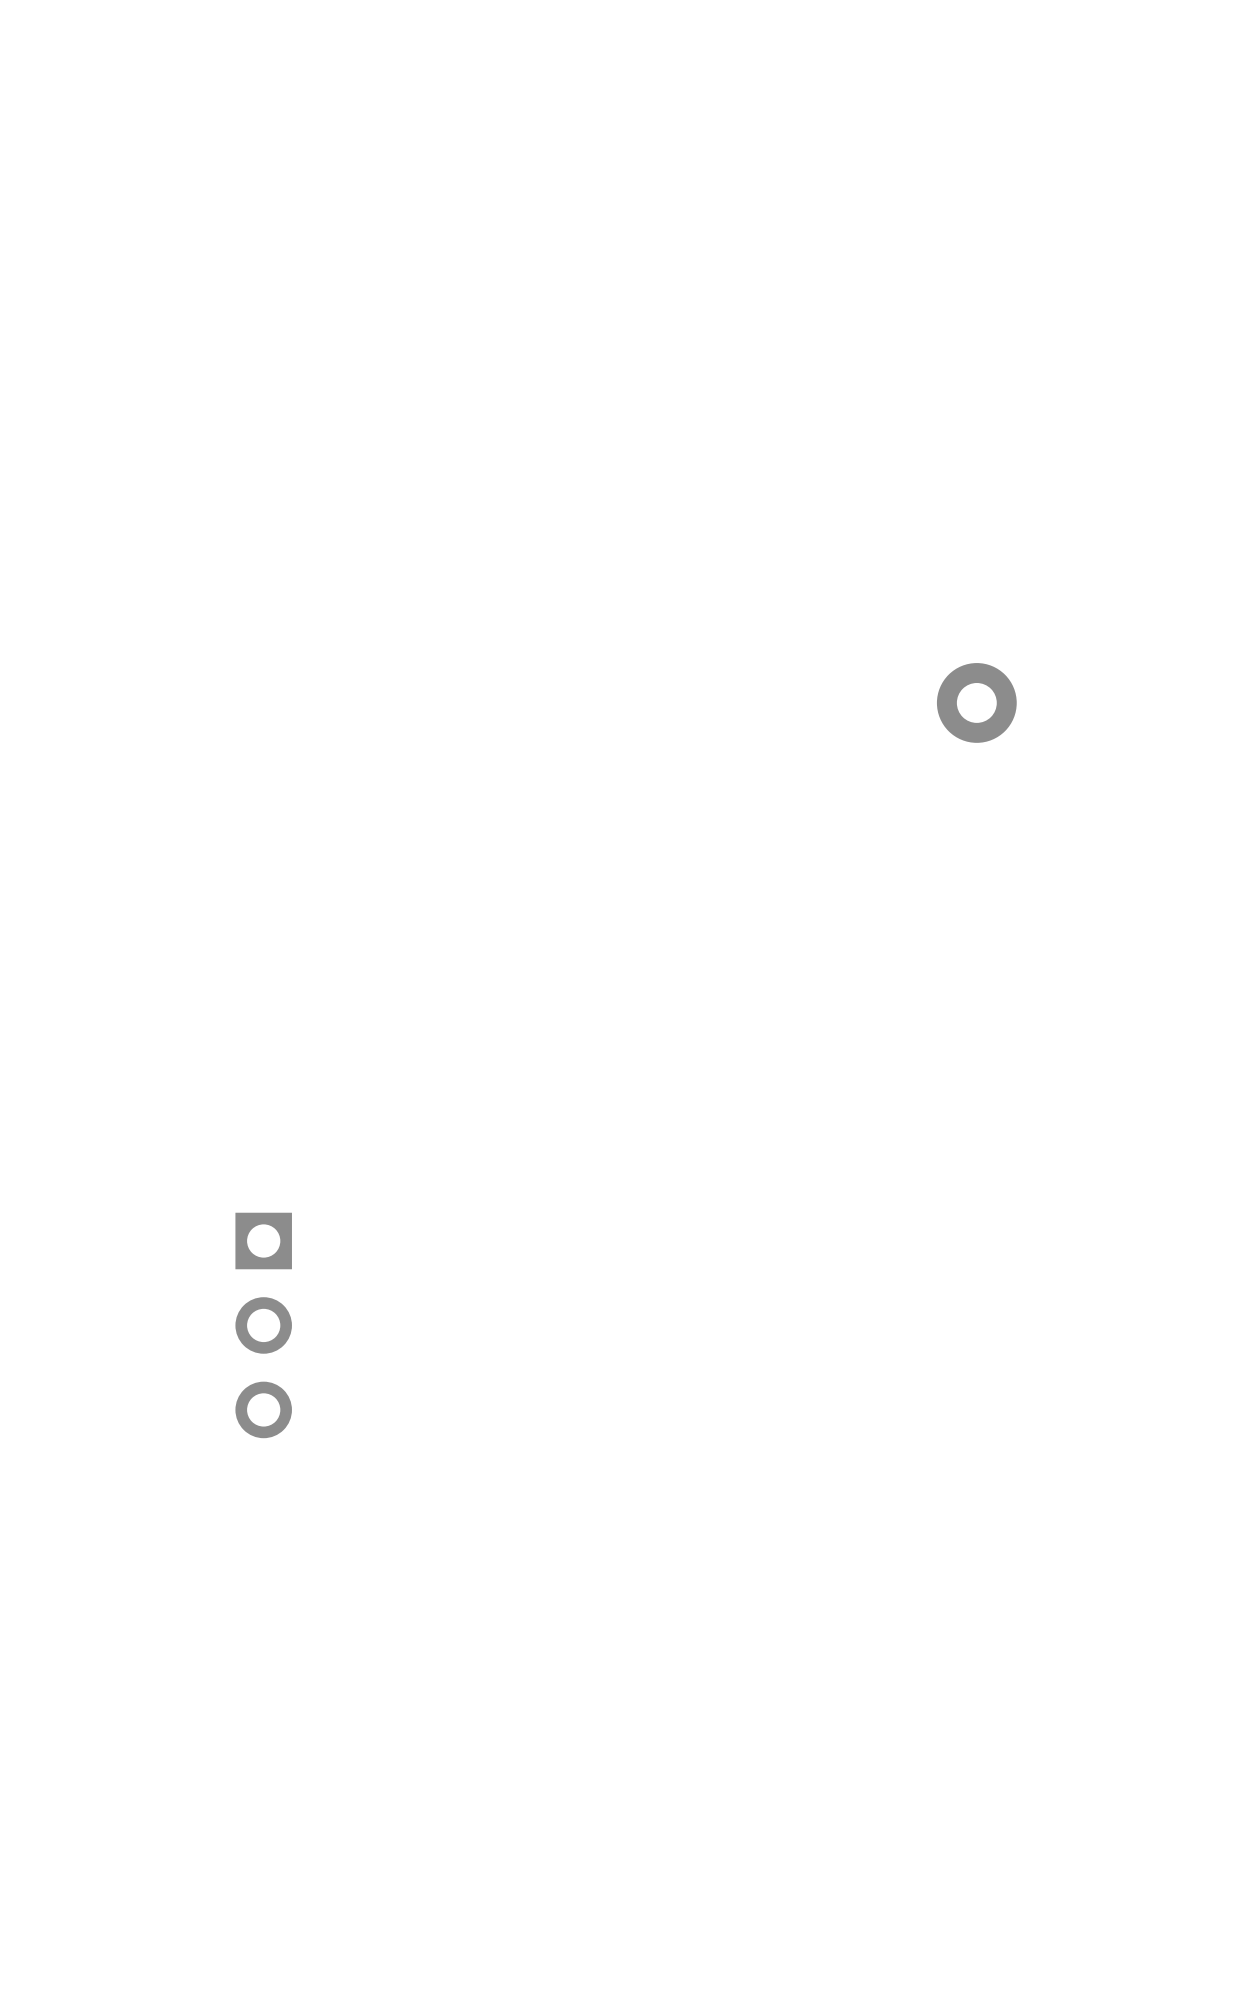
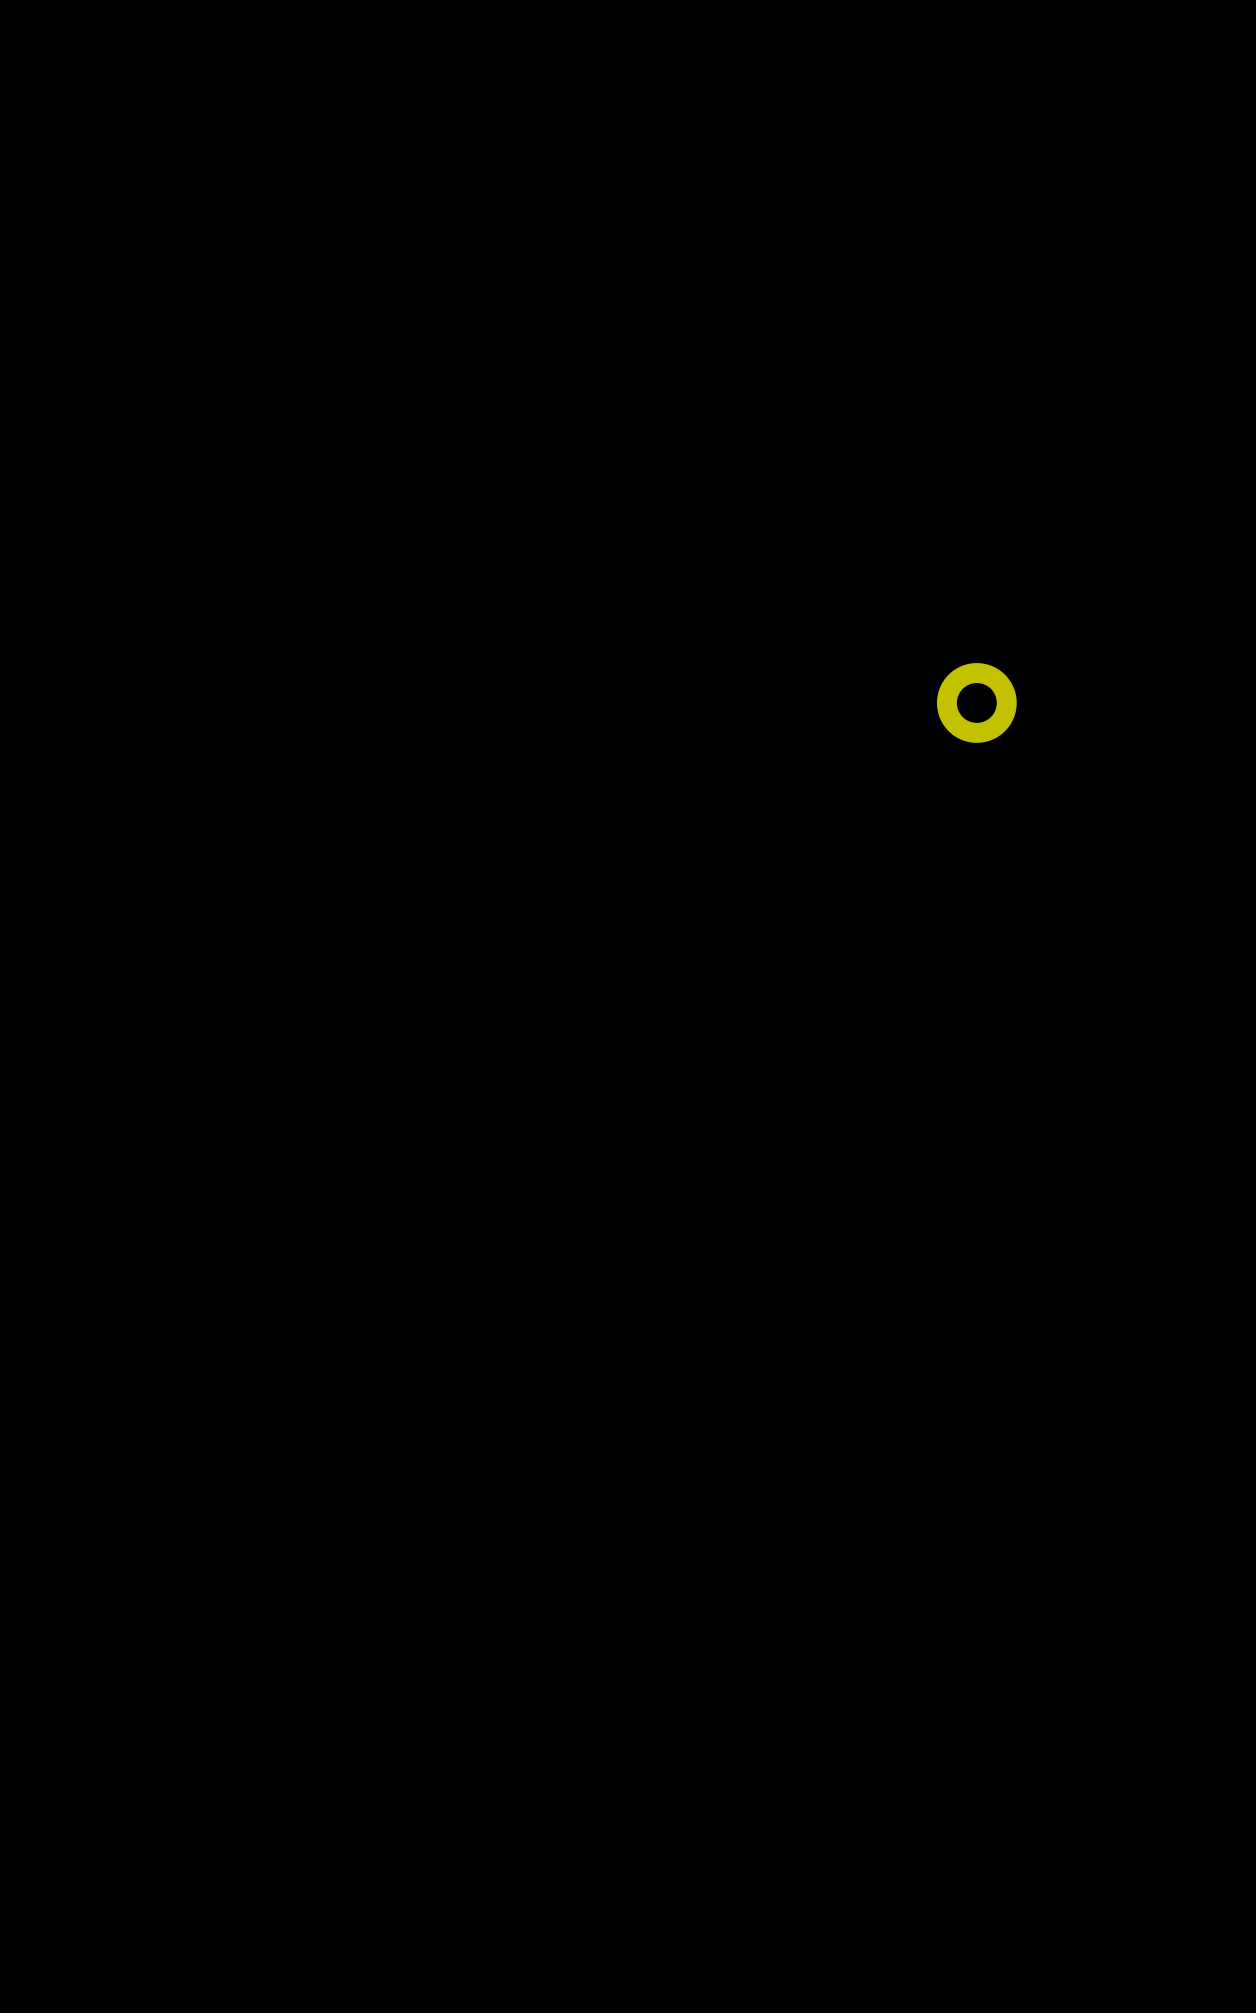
part: (263, 1325) -> none

